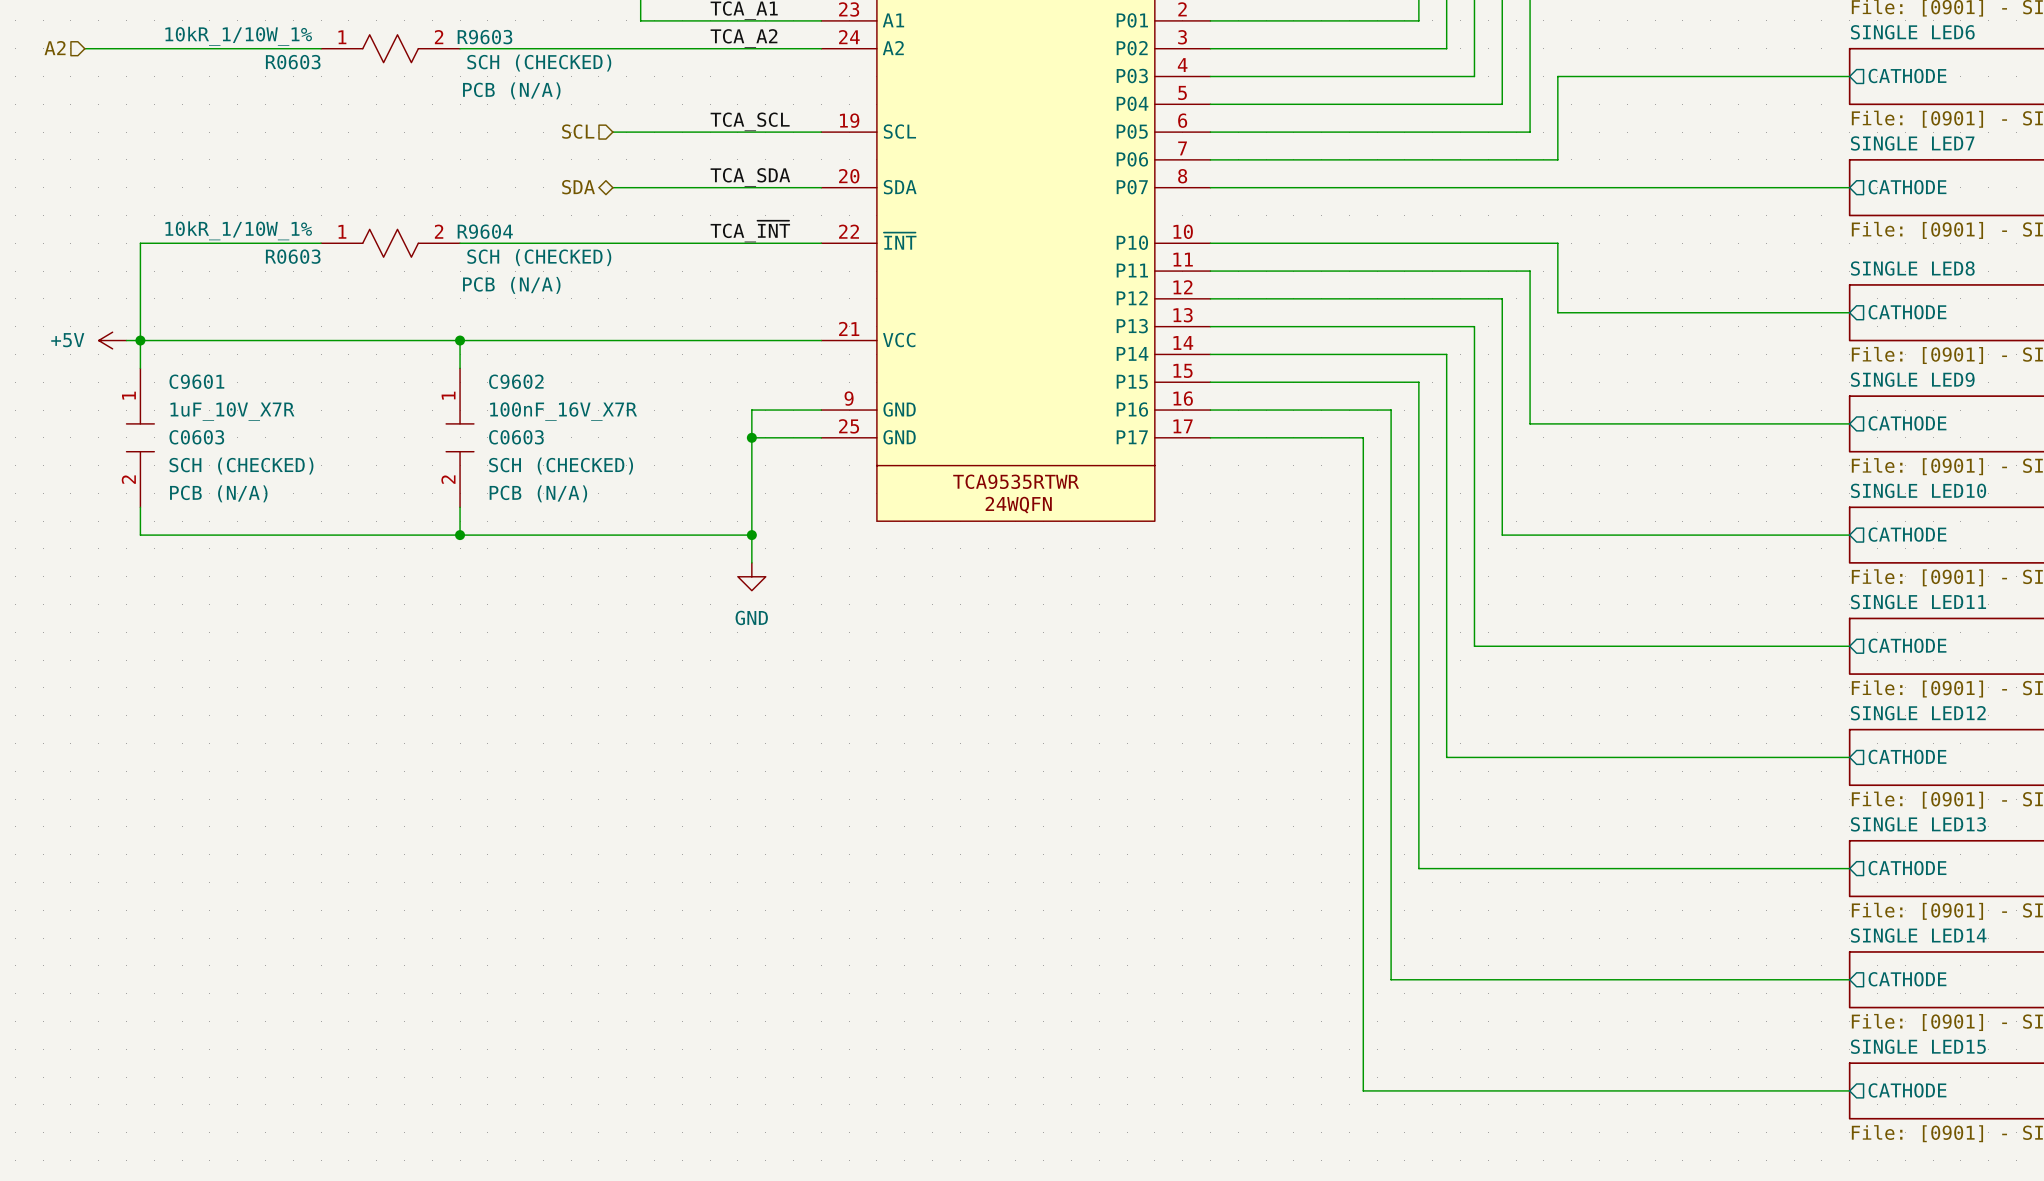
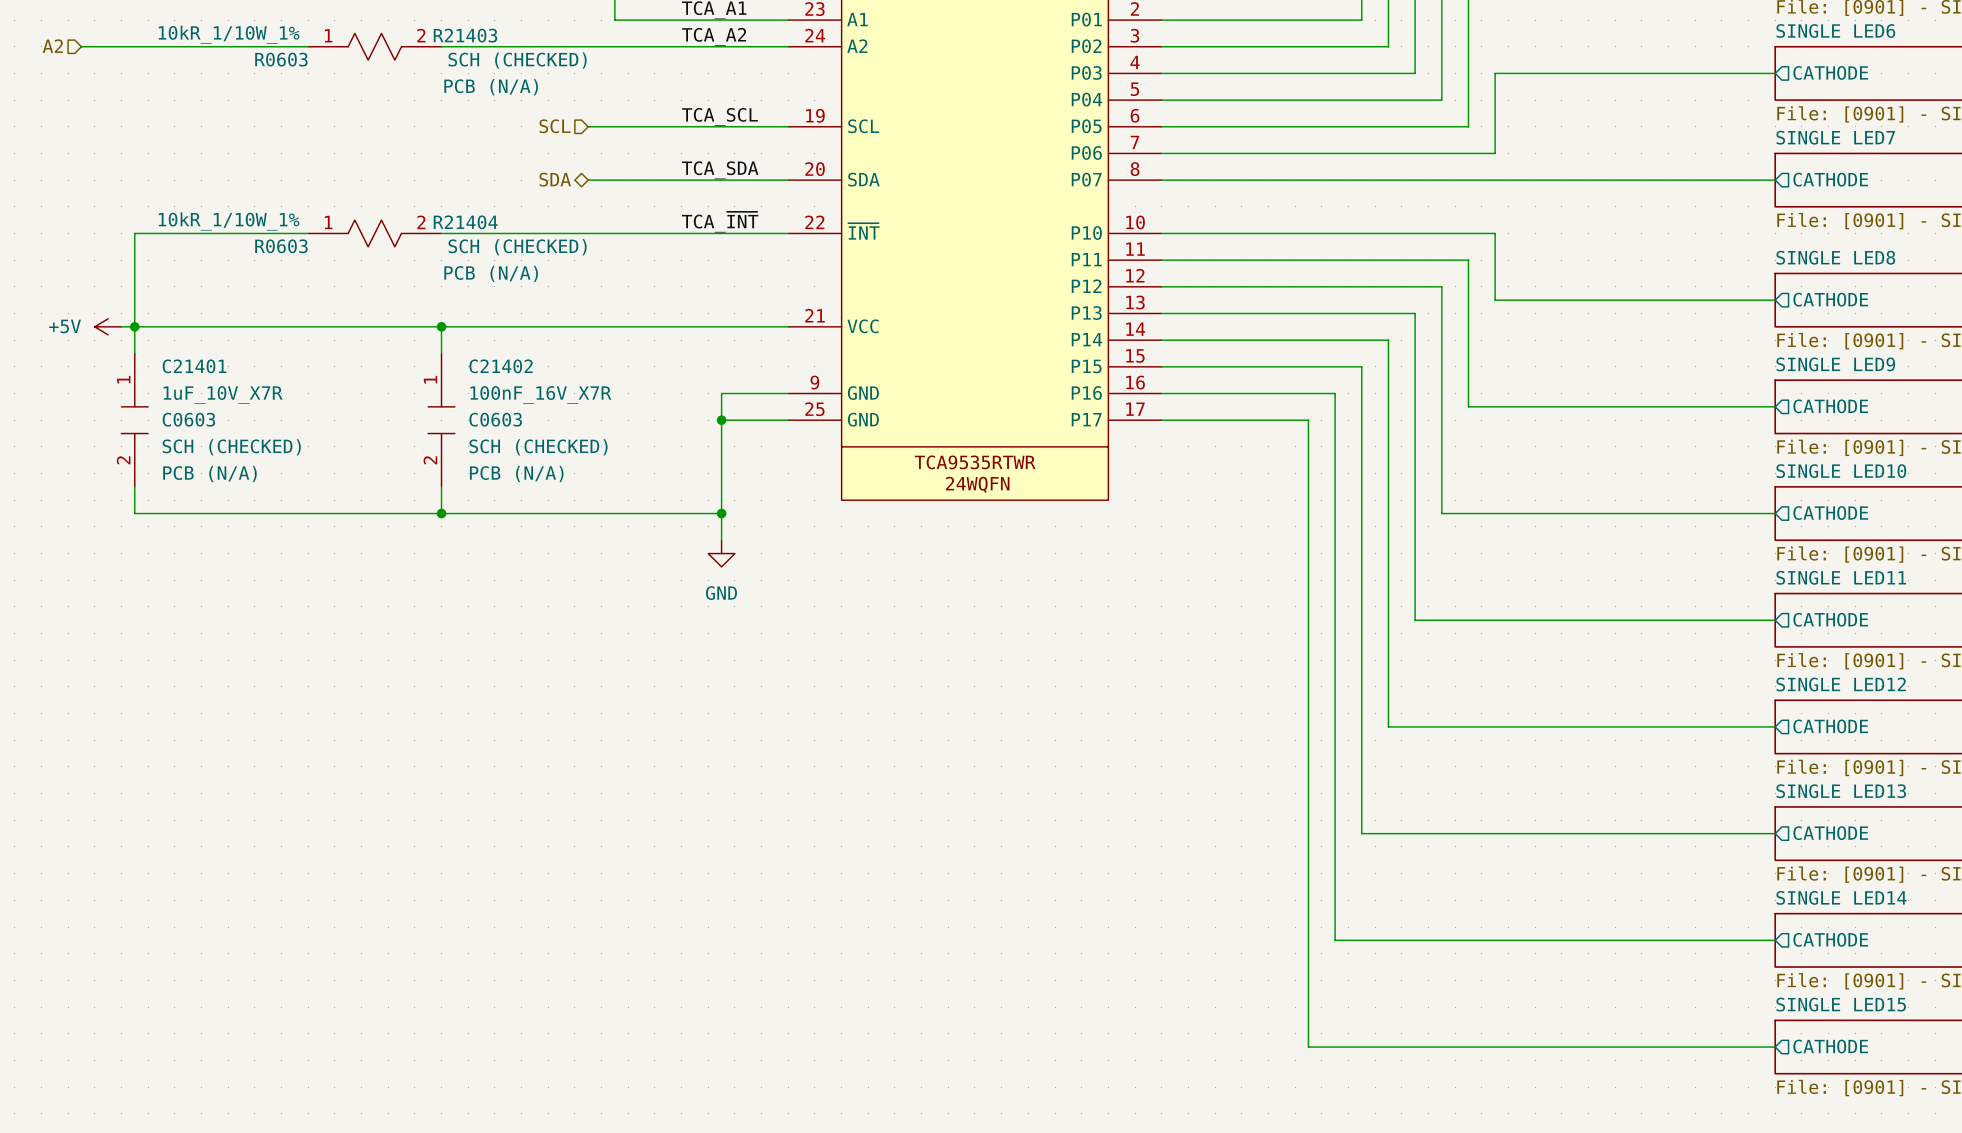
R9603 name: R9603 (484, 37) -> R21403 (465, 35)
R9604 name: R9604 (485, 231) -> R21404 (465, 222)
C9601 name: C9601 (196, 381) -> C21401 (194, 366)
C9602 name: C9602 (516, 381) -> C21402 (501, 366)

